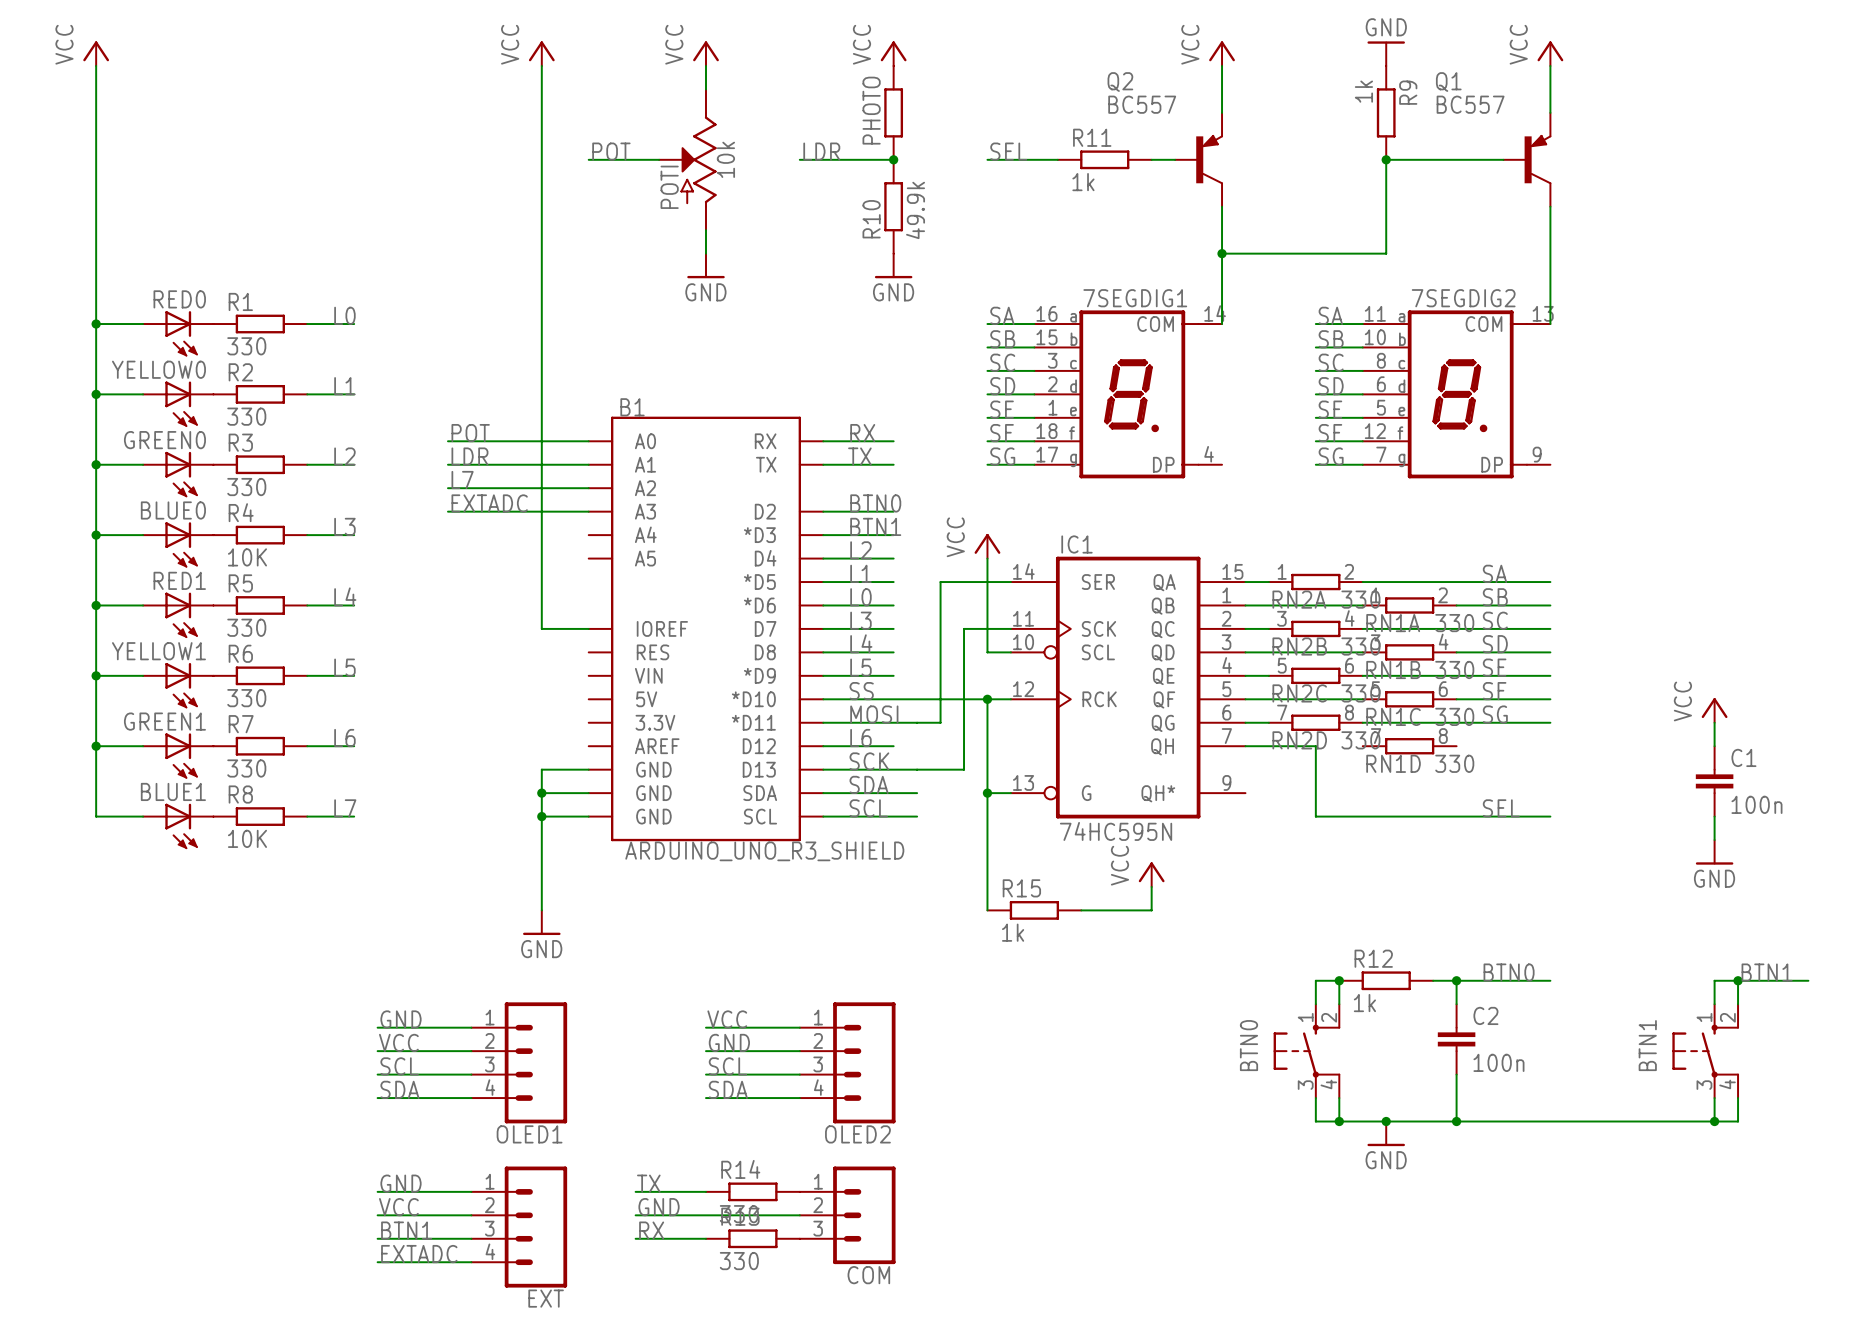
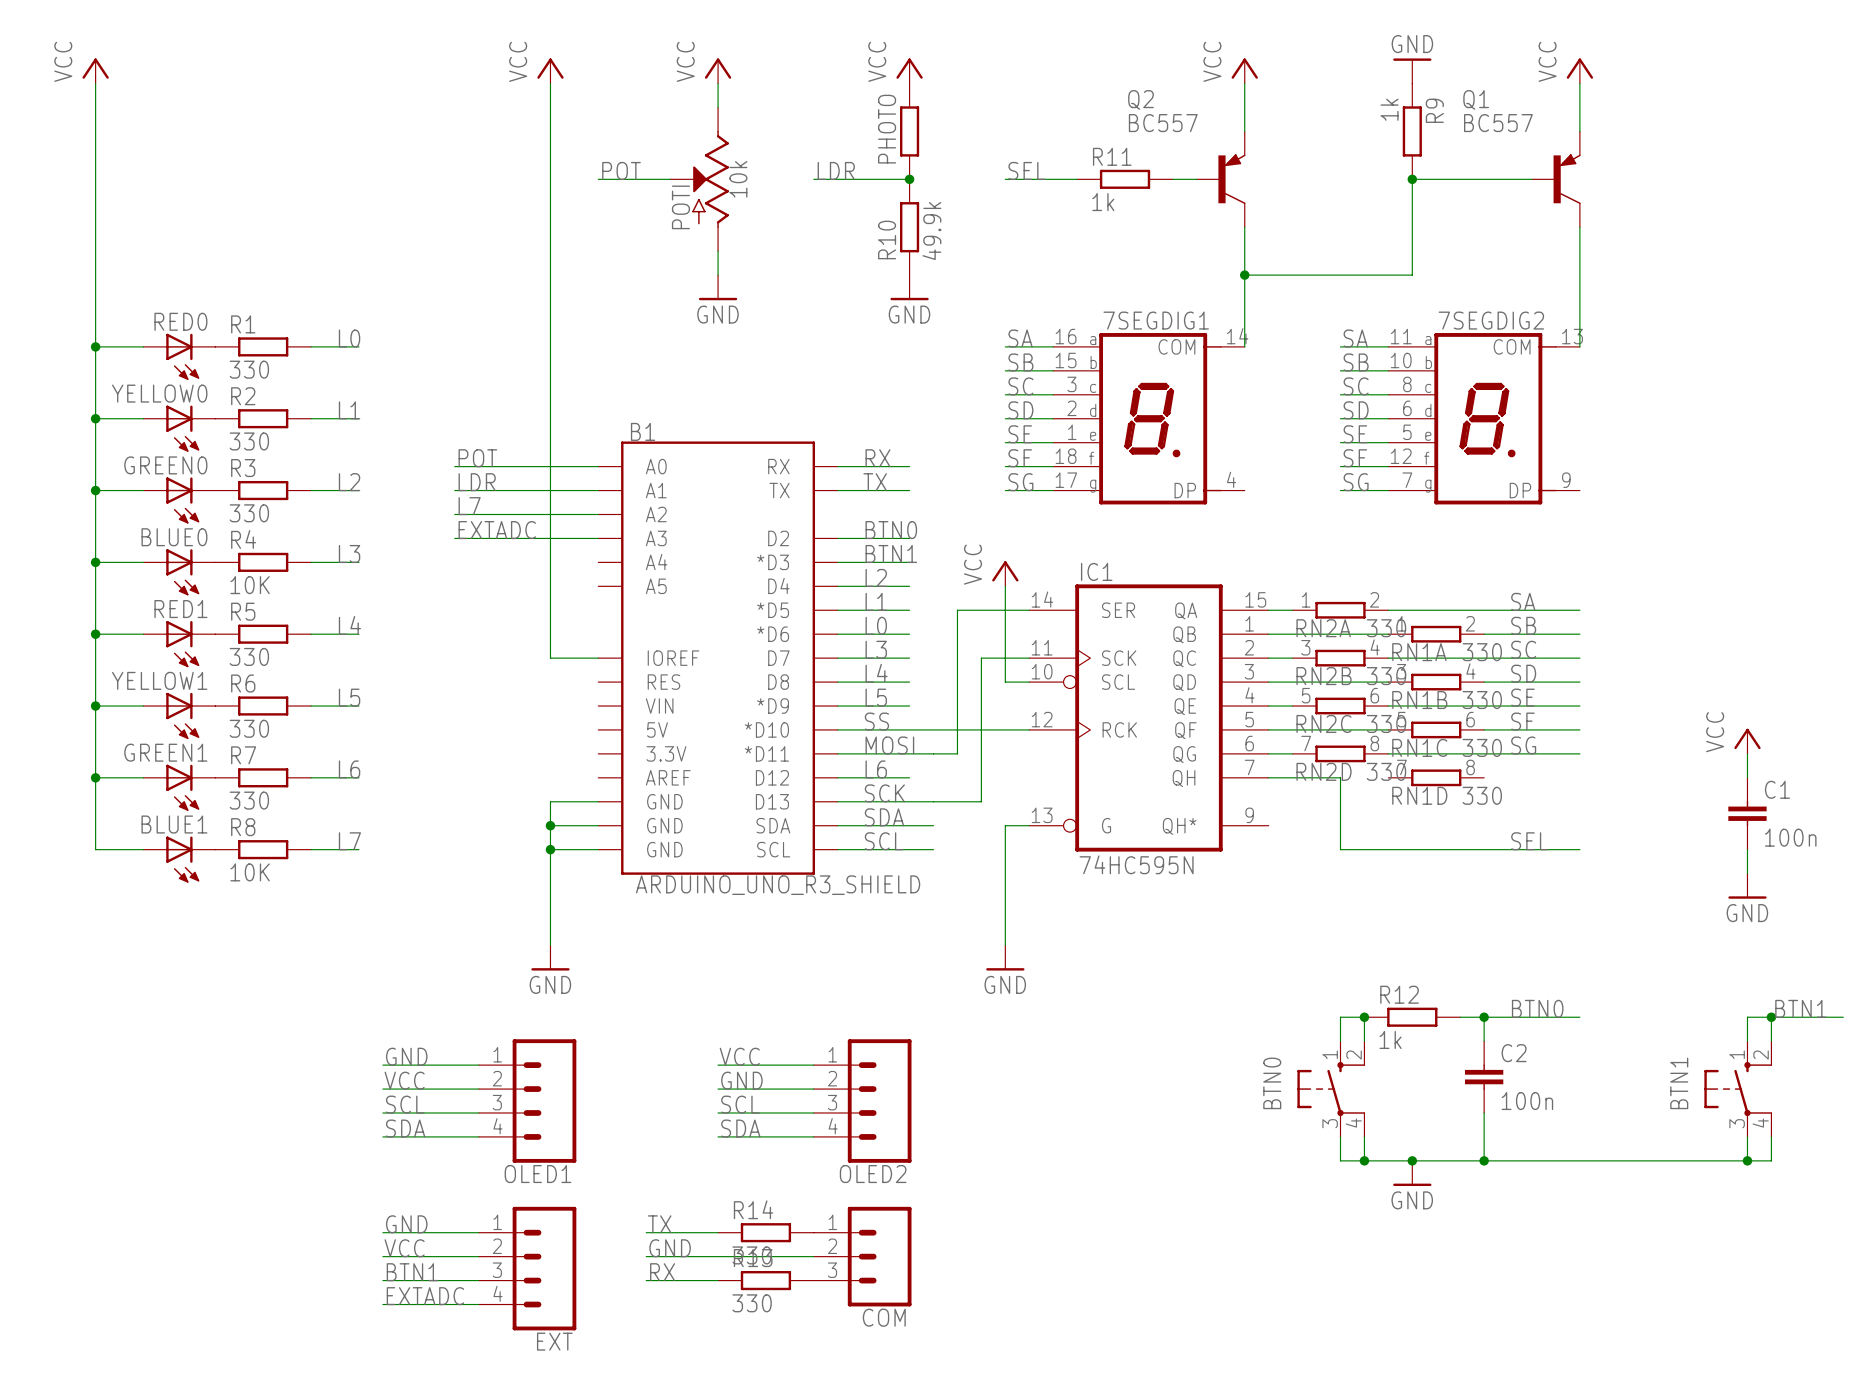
wire: (987, 699) (987, 793) -> none
junction: (987, 699) -> none
junction: (987, 793) -> none
power symbol: VCC (1151, 874) -> none
wire: (1151, 886) (1151, 910) (1081, 910) -> none
R15: 1k (1034, 910) -> none
power symbol: none -> GND (1005, 957)

